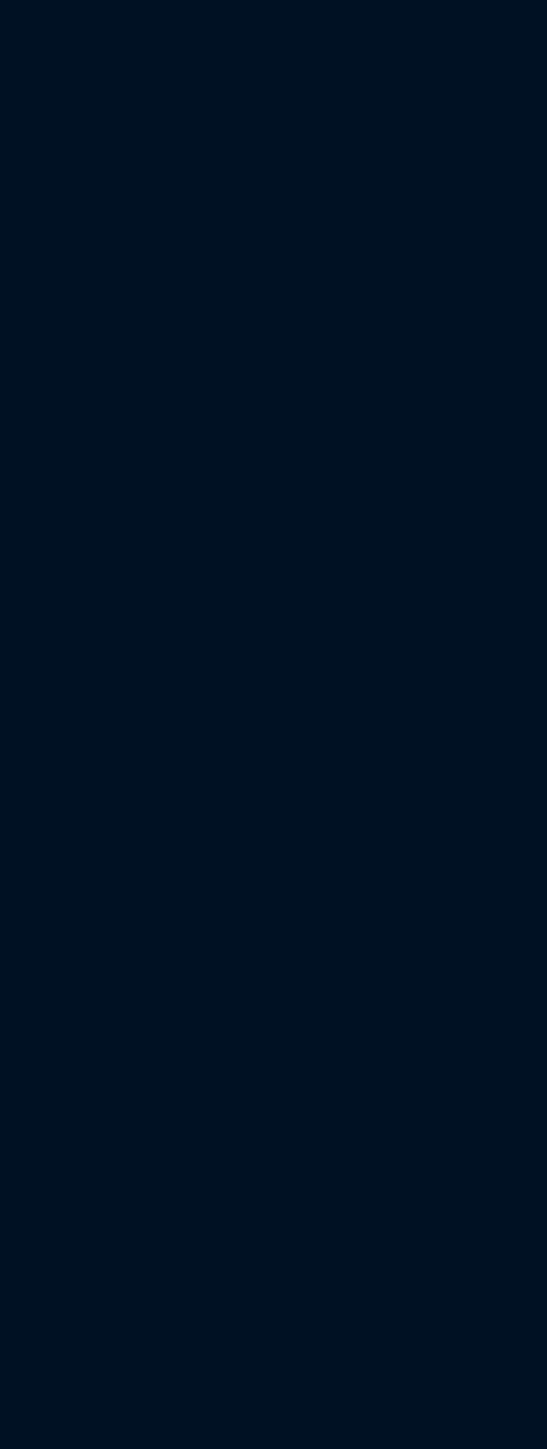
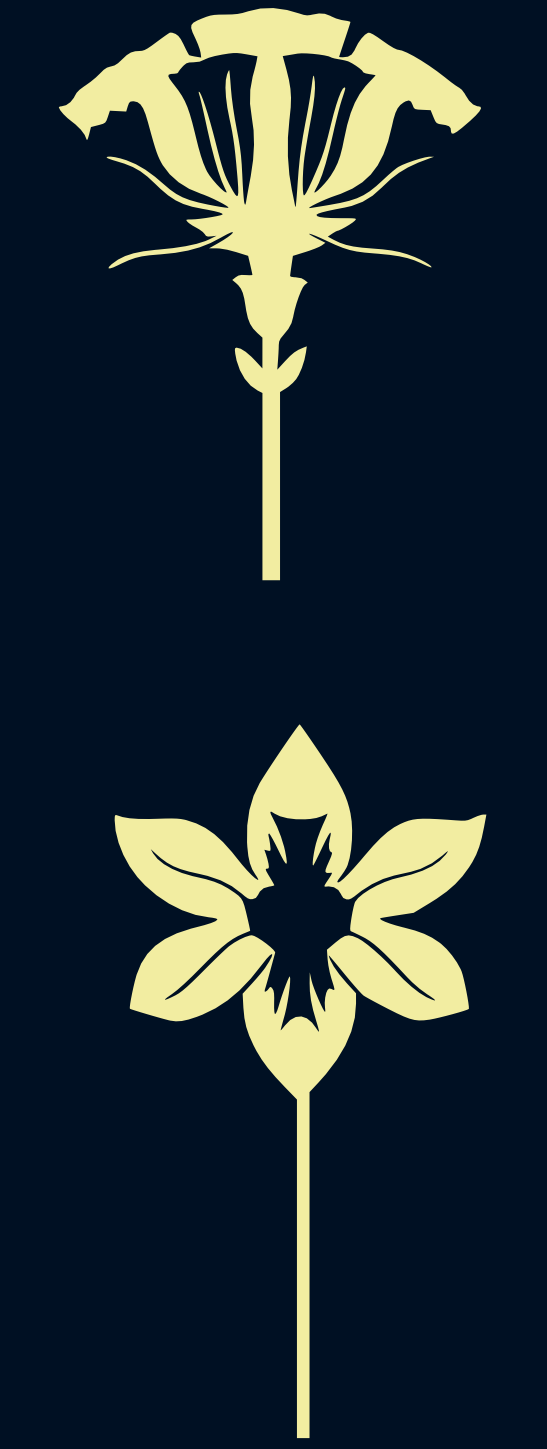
drawing: none -> [58, 8, 481, 581]
drawing: none -> [114, 724, 487, 1439]

